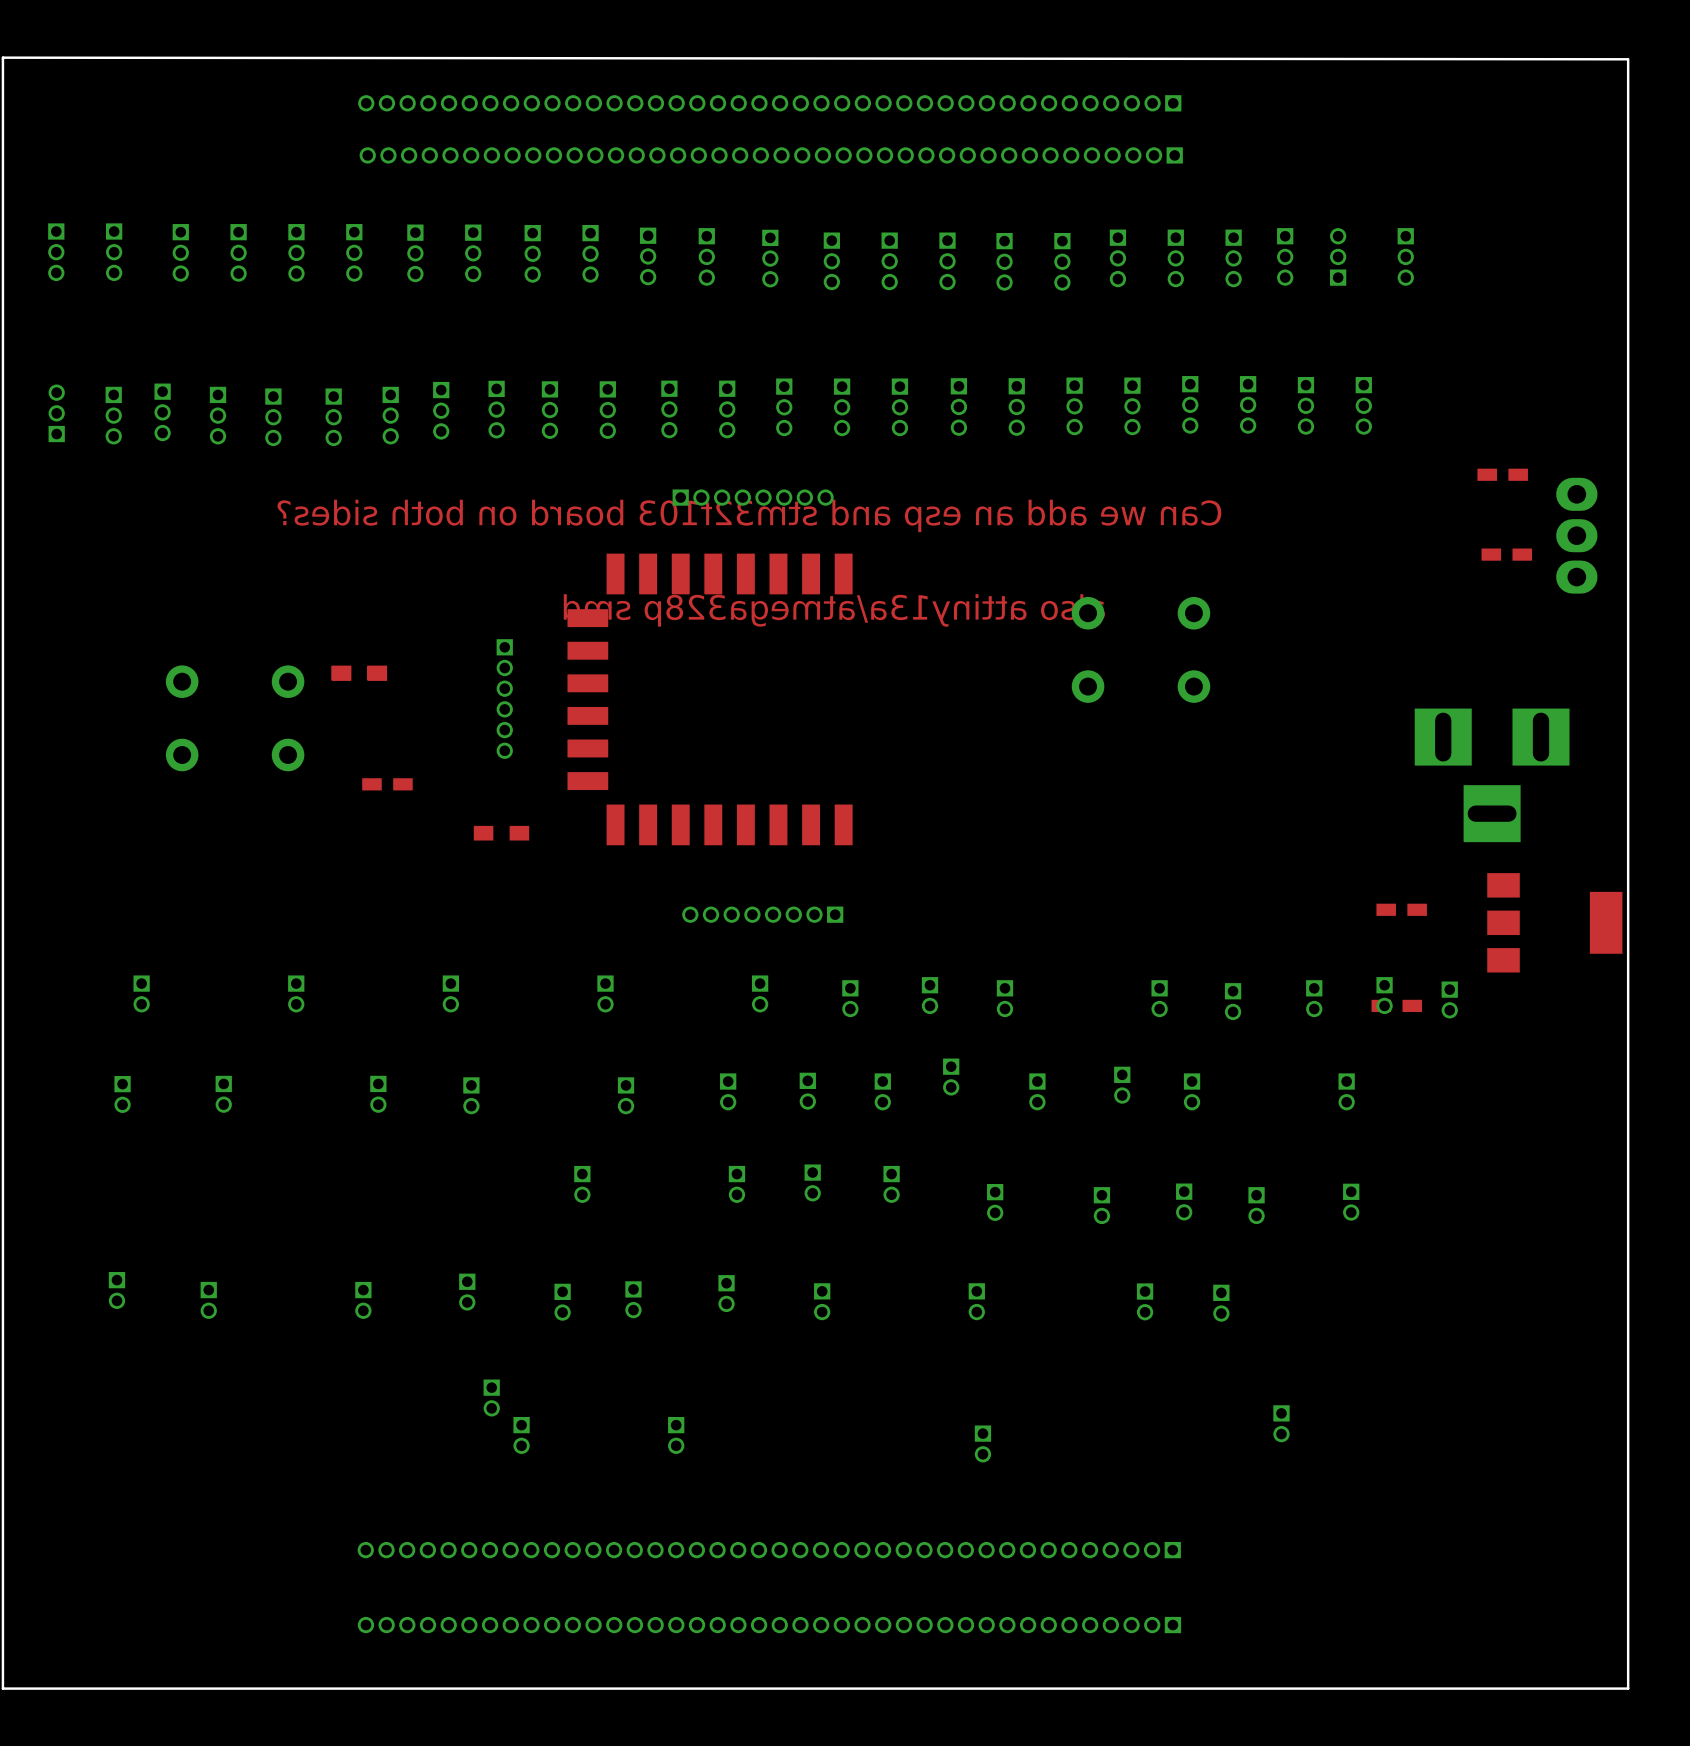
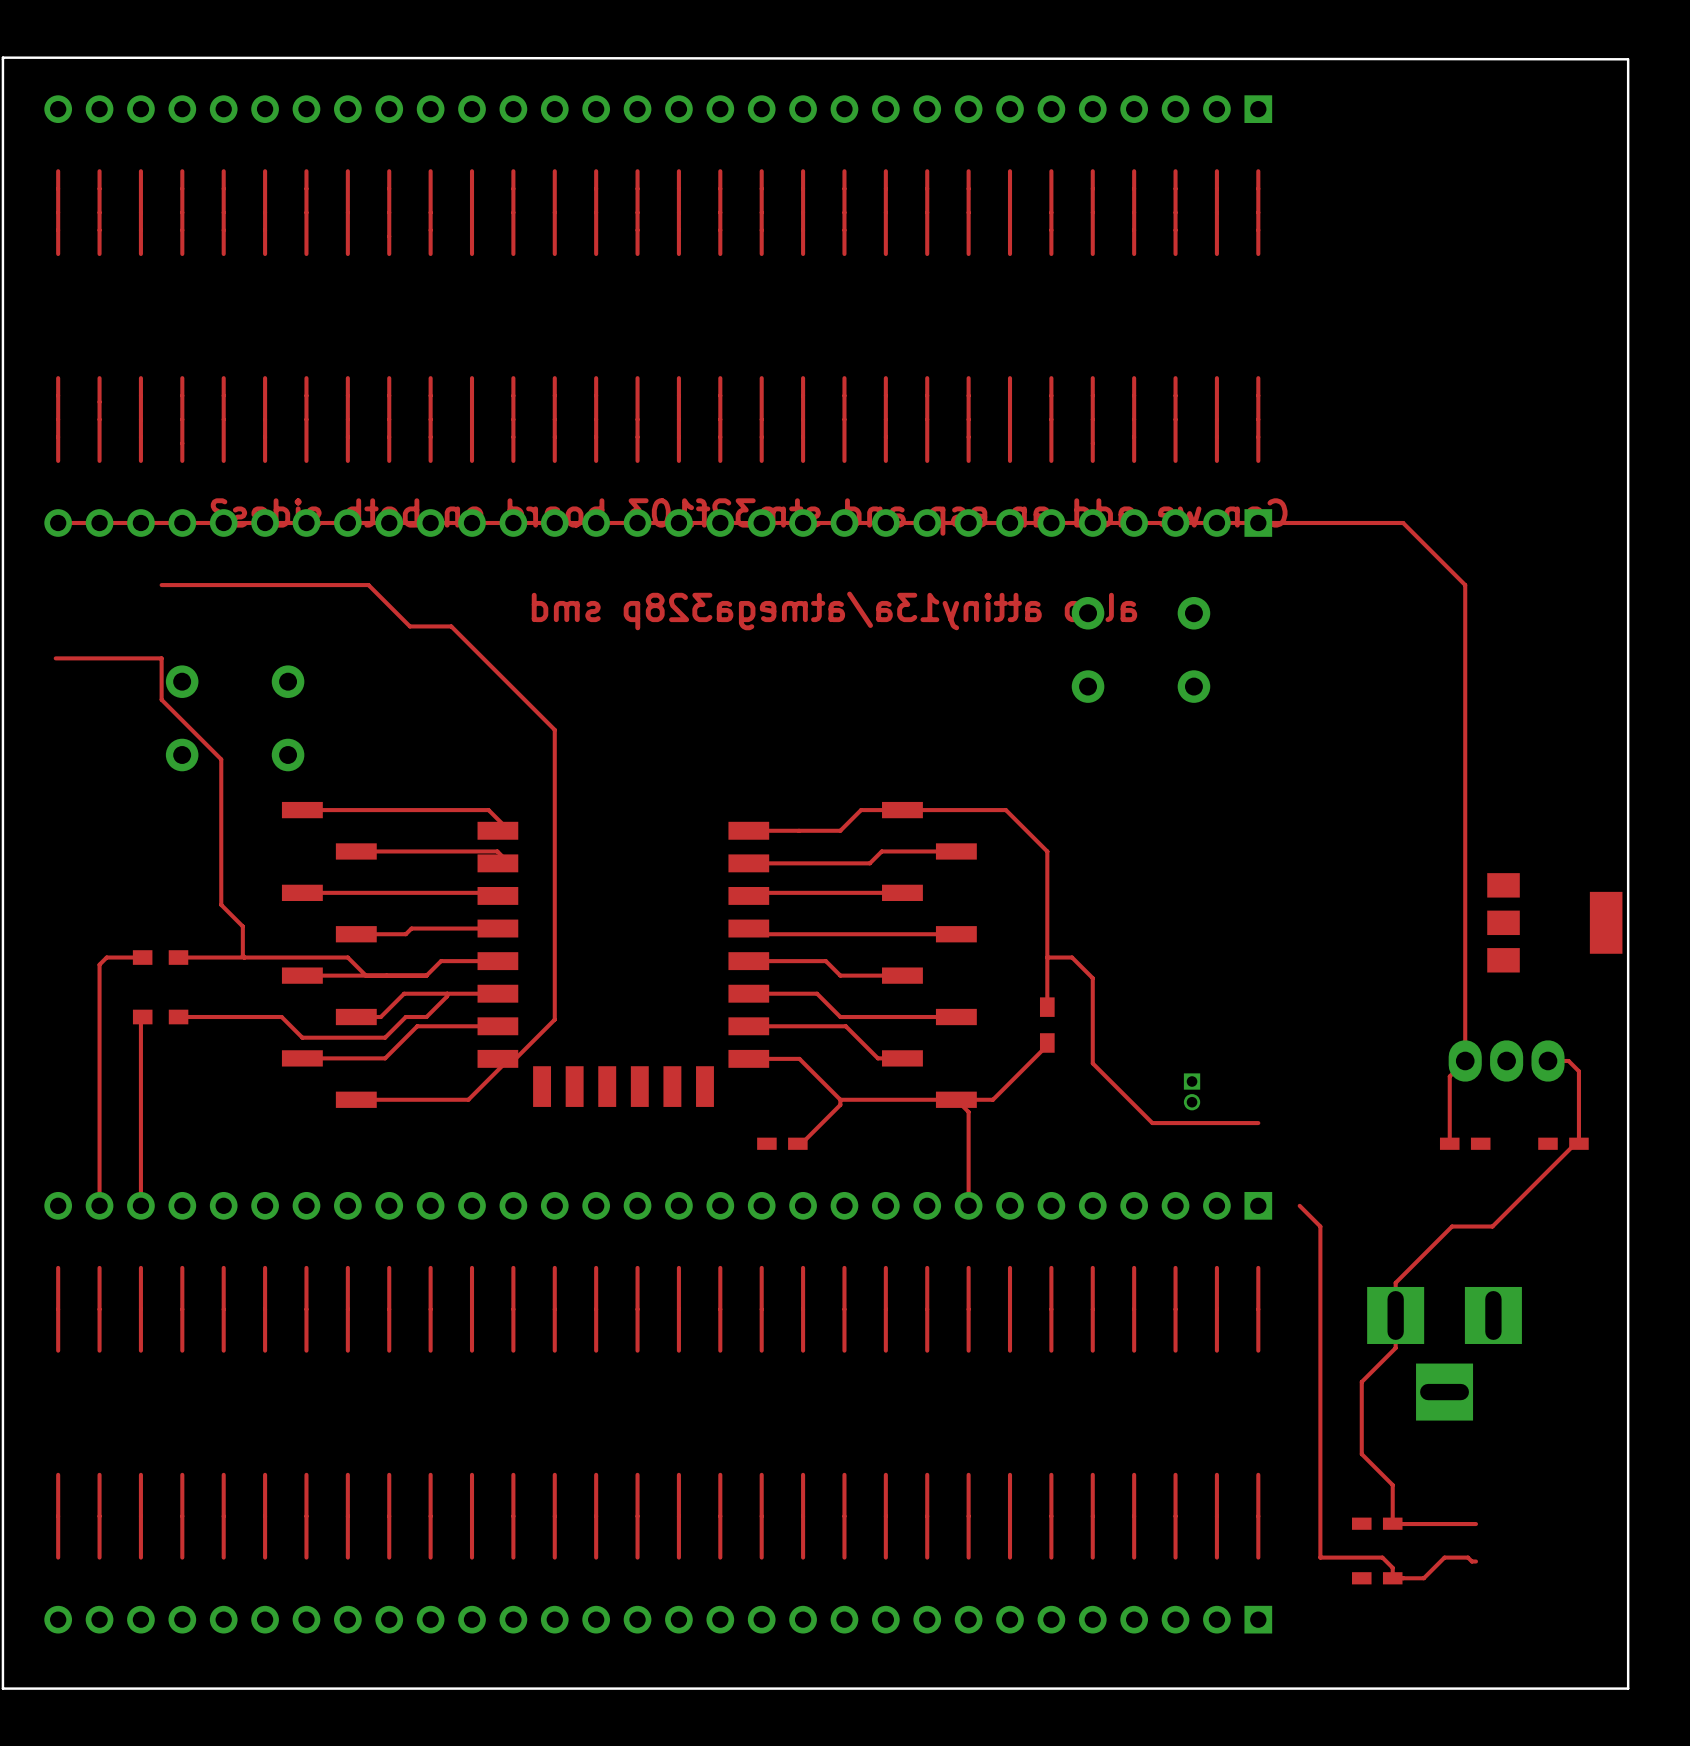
part: (769, 103) -> none
part: none -> (658, 109)
part: (771, 155) -> none
top track: none -> (58, 171) (58, 253)
top track: none -> (99, 171) (99, 253)
top track: none -> (140, 171) (140, 253)
top track: none -> (182, 171) (182, 253)
top track: none -> (223, 171) (223, 253)
top track: none -> (265, 171) (265, 253)
top track: none -> (306, 171) (306, 253)
top track: none -> (347, 171) (347, 253)
top track: none -> (389, 171) (389, 253)
top track: none -> (430, 171) (430, 253)
top track: none -> (472, 171) (472, 253)
top track: none -> (513, 171) (513, 253)
top track: none -> (554, 171) (554, 253)
top track: none -> (596, 171) (596, 253)
top track: none -> (637, 171) (637, 253)
top track: none -> (678, 171) (678, 253)
top track: none -> (720, 171) (720, 253)
top track: none -> (761, 171) (761, 253)
top track: none -> (803, 171) (803, 253)
top track: none -> (844, 171) (844, 253)
top track: none -> (885, 171) (885, 253)
top track: none -> (927, 171) (927, 253)
top track: none -> (968, 171) (968, 253)
top track: none -> (1010, 171) (1010, 253)
top track: none -> (1051, 171) (1051, 253)
top track: none -> (1092, 171) (1092, 253)
top track: none -> (1134, 171) (1134, 253)
top track: none -> (1175, 171) (1175, 253)
top track: none -> (1216, 171) (1216, 253)
top track: none -> (1258, 171) (1258, 253)
part: (56, 252) -> none
part: (114, 252) -> none
part: (180, 252) -> none
part: (238, 252) -> none
part: (296, 252) -> none
part: (354, 252) -> none
part: (415, 253) -> none
part: (473, 253) -> none
part: (532, 253) -> none
part: (590, 253) -> none
part: (648, 256) -> none
part: (706, 256) -> none
part: (1285, 256) -> none
part: (1338, 256) -> none
part: (1405, 256) -> none
part: (770, 258) -> none
part: (1117, 258) -> none
part: (1175, 258) -> none
part: (1233, 258) -> none
part: (831, 261) -> none
part: (889, 261) -> none
part: (947, 261) -> none
part: (1004, 261) -> none
part: (1062, 261) -> none
top track: none -> (58, 378) (58, 460)
top track: none -> (99, 378) (99, 460)
top track: none -> (140, 378) (140, 460)
top track: none -> (182, 378) (182, 460)
top track: none -> (223, 378) (223, 460)
top track: none -> (265, 378) (265, 460)
top track: none -> (306, 378) (306, 460)
top track: none -> (347, 378) (347, 460)
top track: none -> (389, 378) (389, 460)
top track: none -> (430, 378) (430, 460)
top track: none -> (472, 378) (472, 460)
top track: none -> (513, 378) (513, 460)
top track: none -> (554, 378) (554, 460)
top track: none -> (596, 378) (596, 460)
top track: none -> (637, 378) (637, 460)
top track: none -> (678, 378) (678, 460)
top track: none -> (720, 378) (720, 460)
top track: none -> (761, 378) (761, 460)
top track: none -> (803, 378) (803, 460)
top track: none -> (844, 378) (844, 460)
top track: none -> (885, 378) (885, 460)
top track: none -> (927, 378) (927, 460)
top track: none -> (968, 378) (968, 460)
top track: none -> (1010, 378) (1010, 460)
top track: none -> (1051, 378) (1051, 460)
top track: none -> (1092, 378) (1092, 460)
top track: none -> (1134, 378) (1134, 460)
top track: none -> (1175, 378) (1175, 460)
top track: none -> (1216, 378) (1216, 460)
top track: none -> (1258, 378) (1258, 460)
part: (1190, 404) -> none
part: (1248, 404) -> none
part: (1305, 405) -> none
part: (1363, 405) -> none
part: (958, 406) -> none
part: (1016, 406) -> none
part: (1074, 406) -> none
part: (1132, 406) -> none
part: (784, 407) -> none
part: (842, 407) -> none
part: (899, 407) -> none
part: (496, 409) -> none
part: (669, 409) -> none
part: (727, 409) -> none
part: (441, 410) -> none
part: (549, 410) -> none
part: (607, 410) -> none
part: (162, 412) -> none
part: (56, 413) -> none
part: (113, 415) -> none
part: (218, 415) -> none
part: (390, 415) -> none
part: (273, 417) -> none
part: (333, 417) -> none
part: (1502, 474) -> none
part: (753, 497) -> none
top track: none -> (58, 522) (1403, 522) (1465, 585) (1465, 1060) (1449, 1076) (1449, 1143)
part: none -> (658, 522)
part: (1576, 535) -> none
part: (1506, 554) -> none
top track: none -> (161, 585) (368, 585) (409, 626) (451, 626) (554, 729) (554, 1019) (515, 1058) (509, 1058) (468, 1099) (356, 1099)
top track: none -> (55, 658) (161, 658) (161, 699) (221, 759) (221, 904) (242, 926) (244, 957)
part: (359, 673) -> none
part: (504, 699) -> none
part rotation: 0° (710, 699) -> 90° counterclockwise (623, 964)
part position: (710, 699) -> (623, 964)
part: (1492, 775) -> none
part: (387, 784) -> none
top track: none -> (302, 810) (488, 810) (509, 830)
top track: none -> (737, 830) (840, 830) (861, 810) (1005, 810) (1047, 851) (1047, 1007)
part: (501, 833) -> none
top track: none -> (356, 851) (497, 851) (509, 863)
top track: none -> (956, 851) (881, 851) (869, 863) (737, 863)
top track: none -> (302, 892) (506, 892) (509, 895)
top track: none -> (902, 892) (740, 892) (737, 895)
part: (1401, 909) -> none
part: (762, 914) -> none
top track: none -> (509, 928) (411, 928) (405, 934) (356, 934)
top track: none -> (737, 928) (743, 934) (956, 934)
part: none -> (329, 954)
part: none -> (929, 954)
top track: none -> (142, 957) (106, 957) (99, 964) (99, 1205)
part: none -> (160, 957)
top track: none -> (178, 957) (347, 957) (365, 975)
top track: none -> (1047, 957) (1072, 957) (1092, 978) (1092, 1063) (1152, 1123) (1258, 1123)
top track: none -> (509, 961) (441, 961) (426, 975) (302, 975)
top track: none -> (737, 961) (825, 961) (840, 975) (902, 975)
part: (141, 993) -> none
part: (296, 993) -> none
top track: none -> (447, 993) (447, 996) (426, 1017) (405, 1017) (385, 1037) (302, 1037) (281, 1017) (178, 1017)
part: (450, 993) -> none
top track: none -> (509, 993) (404, 993) (380, 1017) (356, 1017)
part: (605, 993) -> none
top track: none -> (737, 993) (817, 993) (840, 1017) (956, 1017)
part: (760, 993) -> none
part: (930, 995) -> none
part: (1384, 995) -> none
part: (850, 998) -> none
part: (1004, 998) -> none
part: (1159, 998) -> none
part: (1314, 998) -> none
part: (1449, 999) -> none
part: (1233, 1001) -> none
part: (1396, 1005) -> none
top track: none -> (140, 1017) (142, 1017) (140, 1018) (140, 1205)
part: none -> (160, 1017)
part: none -> (1047, 1025)
top track: none -> (509, 1026) (417, 1026) (385, 1058) (302, 1058)
top track: none -> (737, 1026) (845, 1026) (877, 1058) (902, 1058)
top track: none -> (1047, 1042) (1047, 1045) (992, 1099) (840, 1099)
top track: none -> (737, 1058) (799, 1058) (840, 1099)
part: none -> (1506, 1060)
top track: none -> (1547, 1060) (1568, 1060) (1578, 1071) (1578, 1143) (1575, 1143) (1492, 1226) (1452, 1226) (1395, 1282) (1395, 1348) (1361, 1381) (1361, 1454) (1392, 1485) (1392, 1523) (1475, 1524)
part: (951, 1077) -> none
part: (1122, 1085) -> none
part: (728, 1091) -> none
part: (807, 1091) -> none
part: (882, 1091) -> none
part: (1037, 1091) -> none
part: (1346, 1091) -> none
part: (122, 1094) -> none
part: (223, 1094) -> none
part: (378, 1094) -> none
part: (471, 1095) -> none
part: (626, 1095) -> none
top track: none -> (840, 1099) (840, 1104) (801, 1143) (797, 1143)
top track: none -> (956, 1099) (968, 1112) (968, 1205)
part: none -> (782, 1143)
part: none -> (1465, 1143)
part: none -> (1563, 1143)
part: (812, 1182) -> none
part: (582, 1184) -> none
part: (736, 1184) -> none
part: (891, 1184) -> none
part: (995, 1202) -> none
part: (1184, 1202) -> none
part: (1351, 1202) -> none
part: none -> (658, 1205)
part: (1101, 1205) -> none
part: (1256, 1205) -> none
top track: none -> (1299, 1205) (1320, 1226) (1320, 1557) (1382, 1557) (1392, 1567) (1392, 1578) (1423, 1578) (1444, 1557) (1468, 1557) (1471, 1561) (1475, 1561)
top track: none -> (58, 1267) (58, 1350)
top track: none -> (99, 1267) (99, 1350)
top track: none -> (140, 1267) (140, 1350)
top track: none -> (182, 1267) (182, 1350)
top track: none -> (223, 1267) (223, 1350)
top track: none -> (265, 1267) (265, 1350)
top track: none -> (306, 1267) (306, 1350)
top track: none -> (347, 1267) (347, 1350)
top track: none -> (389, 1267) (389, 1350)
top track: none -> (430, 1267) (430, 1350)
top track: none -> (472, 1267) (472, 1350)
top track: none -> (513, 1267) (513, 1350)
top track: none -> (554, 1267) (554, 1350)
top track: none -> (596, 1267) (596, 1350)
top track: none -> (637, 1267) (637, 1350)
top track: none -> (678, 1267) (678, 1350)
top track: none -> (720, 1267) (720, 1350)
top track: none -> (761, 1267) (761, 1350)
top track: none -> (803, 1267) (803, 1350)
top track: none -> (844, 1267) (844, 1350)
top track: none -> (885, 1267) (885, 1350)
top track: none -> (927, 1267) (927, 1350)
top track: none -> (968, 1267) (968, 1350)
top track: none -> (1010, 1267) (1010, 1350)
top track: none -> (1051, 1267) (1051, 1350)
top track: none -> (1092, 1267) (1092, 1350)
top track: none -> (1134, 1267) (1134, 1350)
top track: none -> (1175, 1267) (1175, 1350)
top track: none -> (1216, 1267) (1216, 1350)
top track: none -> (1258, 1267) (1258, 1350)
part: (116, 1290) -> none
part: (467, 1292) -> none
part: (726, 1293) -> none
part: (633, 1299) -> none
part: (208, 1300) -> none
part: (363, 1300) -> none
part: (822, 1301) -> none
part: (976, 1301) -> none
part: (1145, 1301) -> none
part: (562, 1302) -> none
part: (1221, 1303) -> none
part: none -> (1444, 1353)
part: (491, 1398) -> none
part: (1281, 1423) -> none
part: (521, 1435) -> none
part: (676, 1435) -> none
part: (982, 1443) -> none
top track: none -> (58, 1474) (58, 1557)
top track: none -> (99, 1474) (99, 1557)
top track: none -> (140, 1474) (140, 1557)
top track: none -> (182, 1474) (182, 1557)
top track: none -> (223, 1474) (223, 1557)
top track: none -> (265, 1474) (265, 1557)
top track: none -> (306, 1474) (306, 1557)
top track: none -> (347, 1474) (347, 1557)
top track: none -> (389, 1474) (389, 1557)
top track: none -> (430, 1474) (430, 1557)
top track: none -> (472, 1474) (472, 1557)
top track: none -> (513, 1474) (513, 1557)
top track: none -> (554, 1474) (554, 1557)
top track: none -> (596, 1474) (596, 1557)
top track: none -> (637, 1474) (637, 1557)
top track: none -> (678, 1474) (678, 1557)
top track: none -> (720, 1474) (720, 1557)
top track: none -> (761, 1474) (761, 1557)
top track: none -> (803, 1474) (803, 1557)
top track: none -> (844, 1474) (844, 1557)
top track: none -> (885, 1474) (885, 1557)
top track: none -> (927, 1474) (927, 1557)
top track: none -> (968, 1474) (968, 1557)
top track: none -> (1010, 1474) (1010, 1557)
top track: none -> (1051, 1474) (1051, 1557)
top track: none -> (1092, 1474) (1092, 1557)
top track: none -> (1134, 1474) (1134, 1557)
top track: none -> (1175, 1474) (1175, 1557)
top track: none -> (1216, 1474) (1216, 1557)
top track: none -> (1258, 1474) (1258, 1557)
part: none -> (1377, 1523)
part: (769, 1550) -> none
part: none -> (1377, 1578)
part: none -> (658, 1619)
part: (769, 1625) -> none

